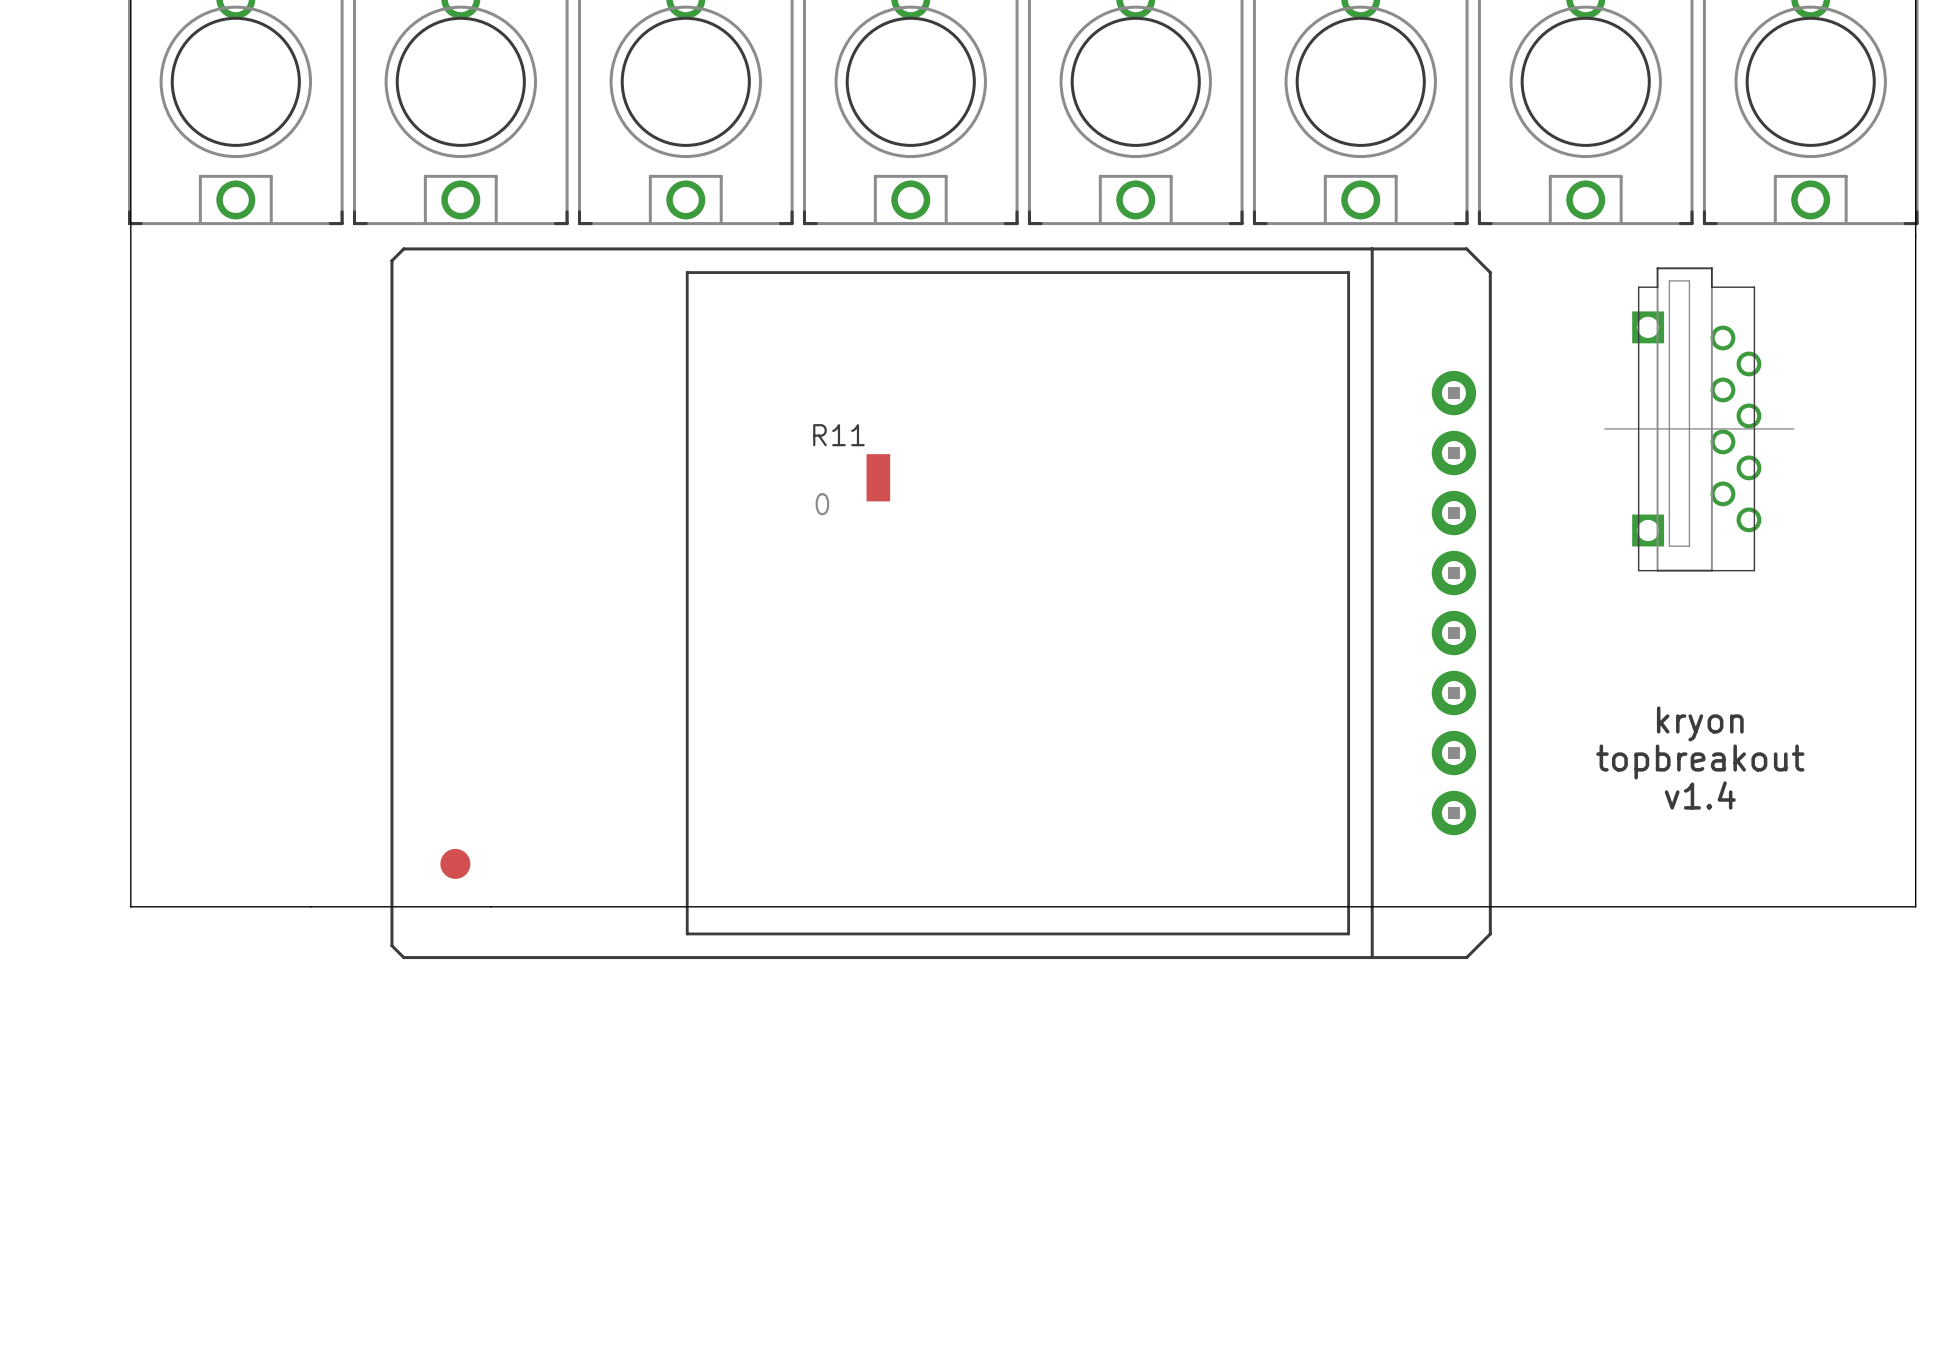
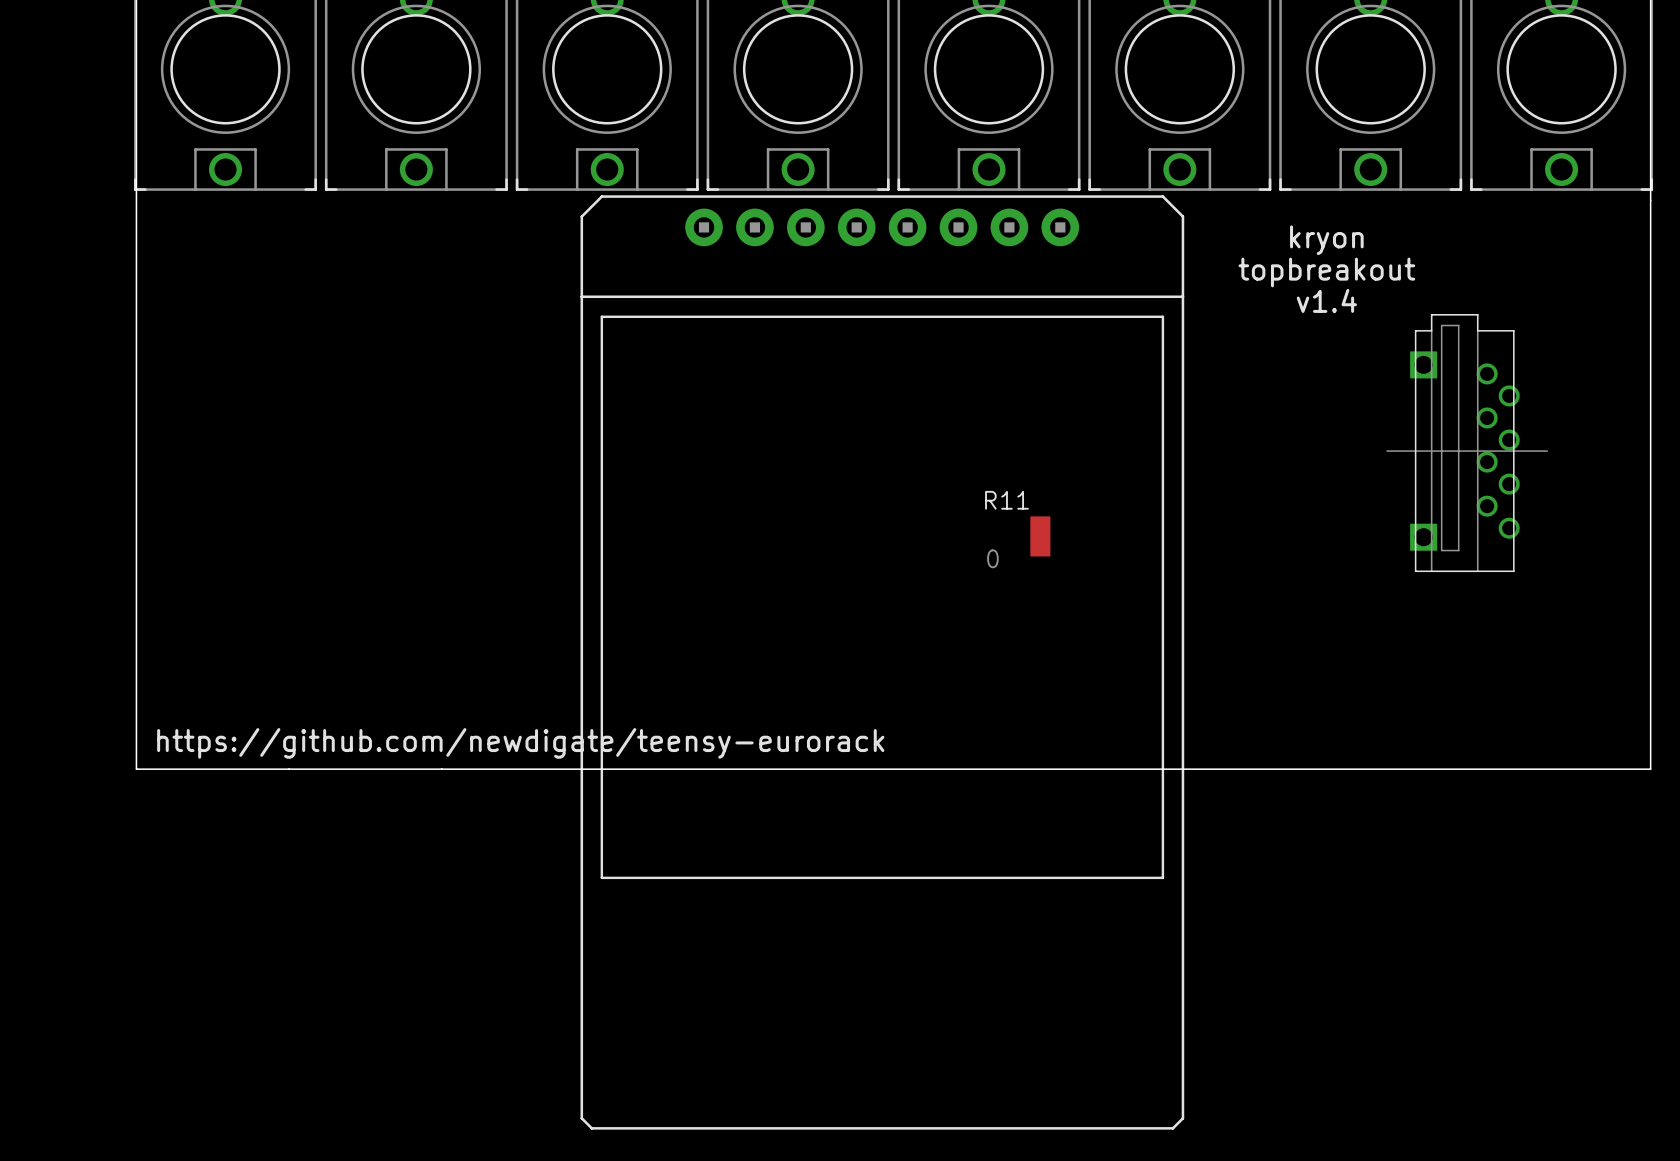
part position: (1699, 419) -> (1467, 443)
R11 position: (878, 477) -> (1040, 536)
part rotation: 0° (941, 603) -> 90° counterclockwise (882, 662)
text position: kryon (1700, 723) -> kryon (1326, 240)
text position: topbreakout (1700, 761) -> topbreakout (1326, 272)
text position: v1.4 (1700, 795) -> v1.4 (1326, 300)
part: (455, 863) -> none
text: none -> https://github.com/newdigate/teensy-eurorack (520, 743)

